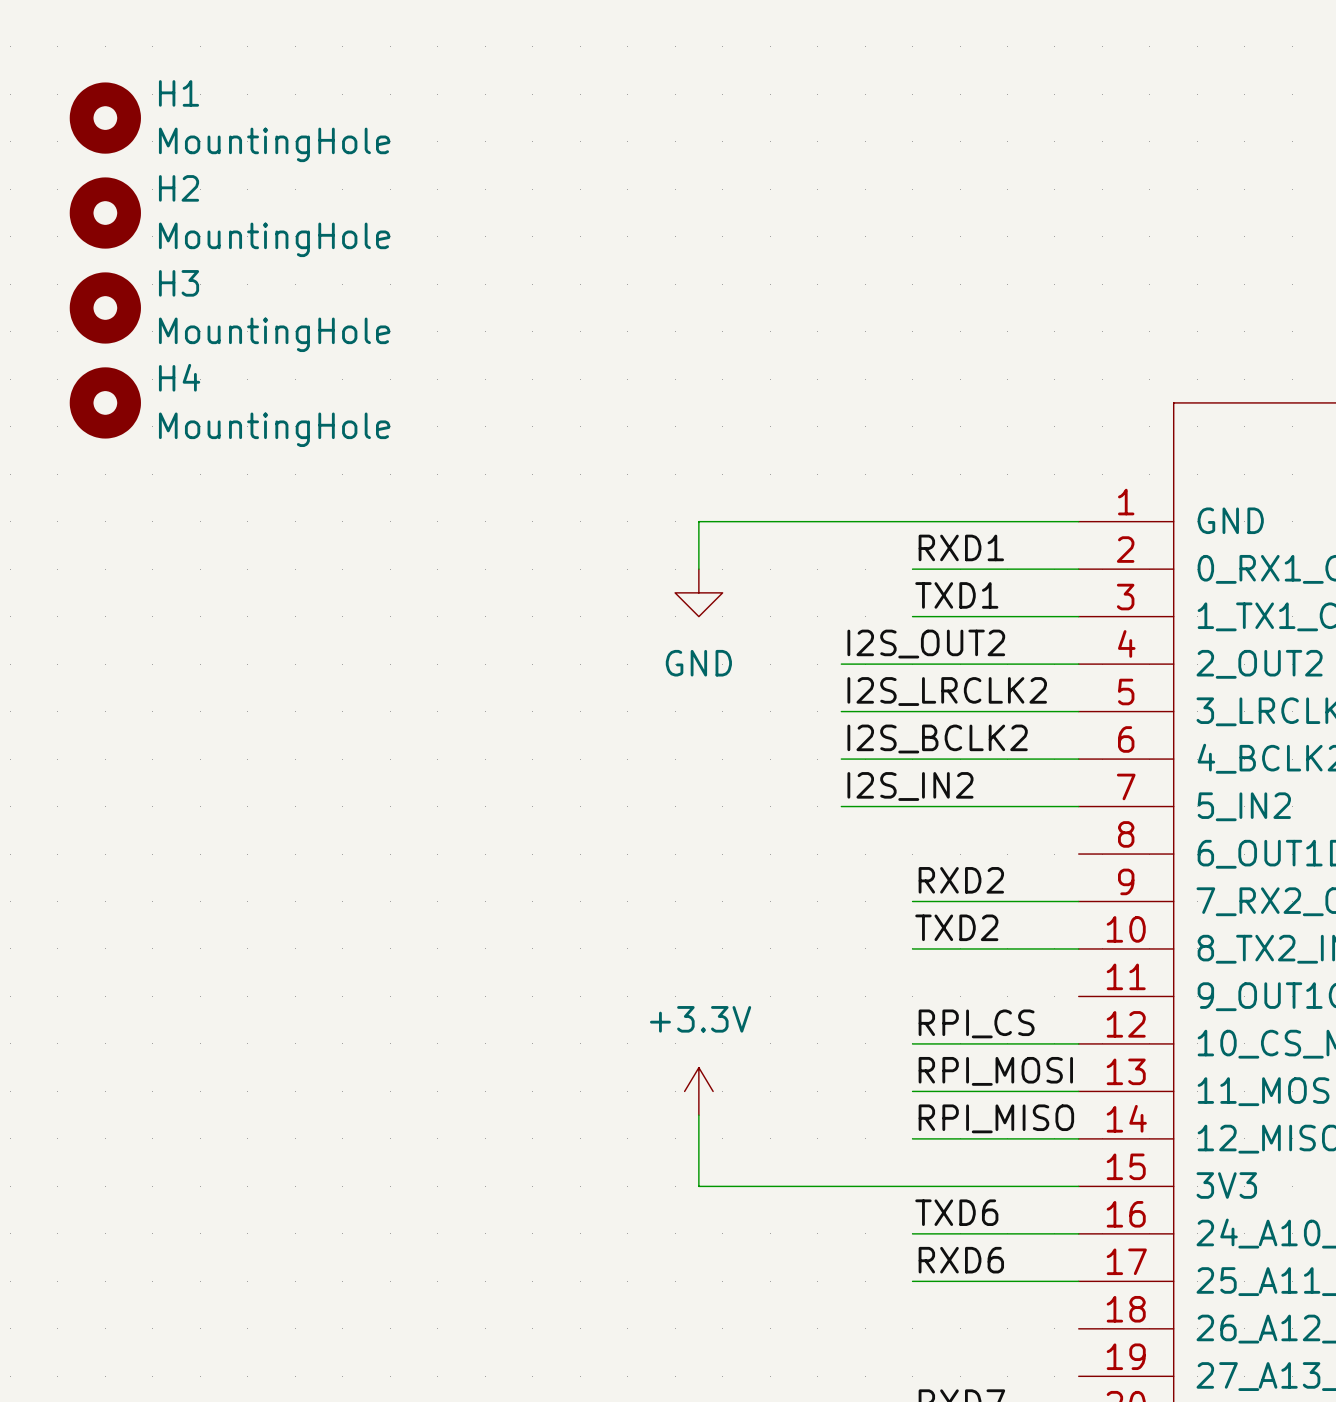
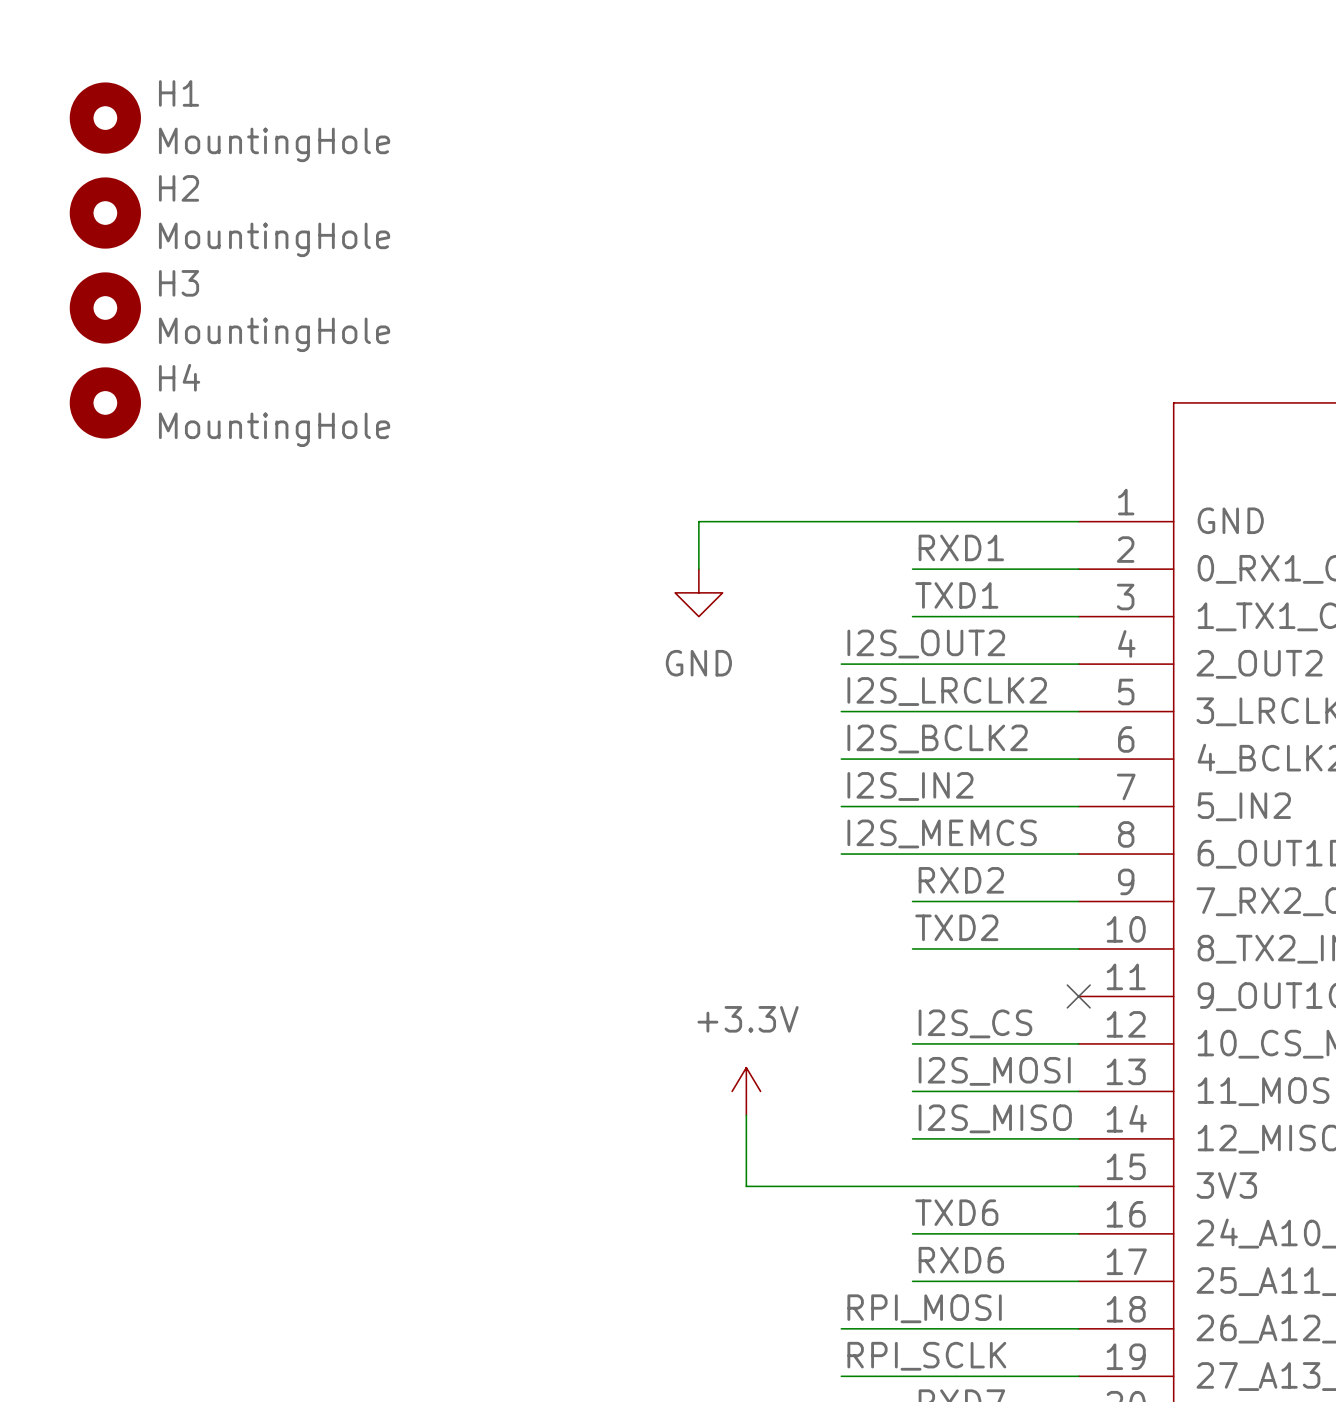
label: none -> I2S_MEMCS (942, 833)
wire: none -> (841, 854) (1078, 854)
no-connect mark: none -> (1078, 996)
label: RPI_CS (976, 1023) -> I2S_CS (975, 1023)
label: RPI_MOSI (995, 1071) -> I2S_MOSI (994, 1071)
power symbol position: +3.3V (698, 1091) -> +3.3V (746, 1091)
wire: (698, 1115) (698, 1186) (746, 1186) -> (746, 1115) (746, 1186)
label: RPI_MISO (996, 1118) -> I2S_MISO (995, 1118)
label: none -> RPI_MOSI (924, 1308)
wire: none -> (841, 1328) (1078, 1328)
label: none -> RPI_SCLK (926, 1356)
wire: none -> (841, 1376) (1078, 1376)

